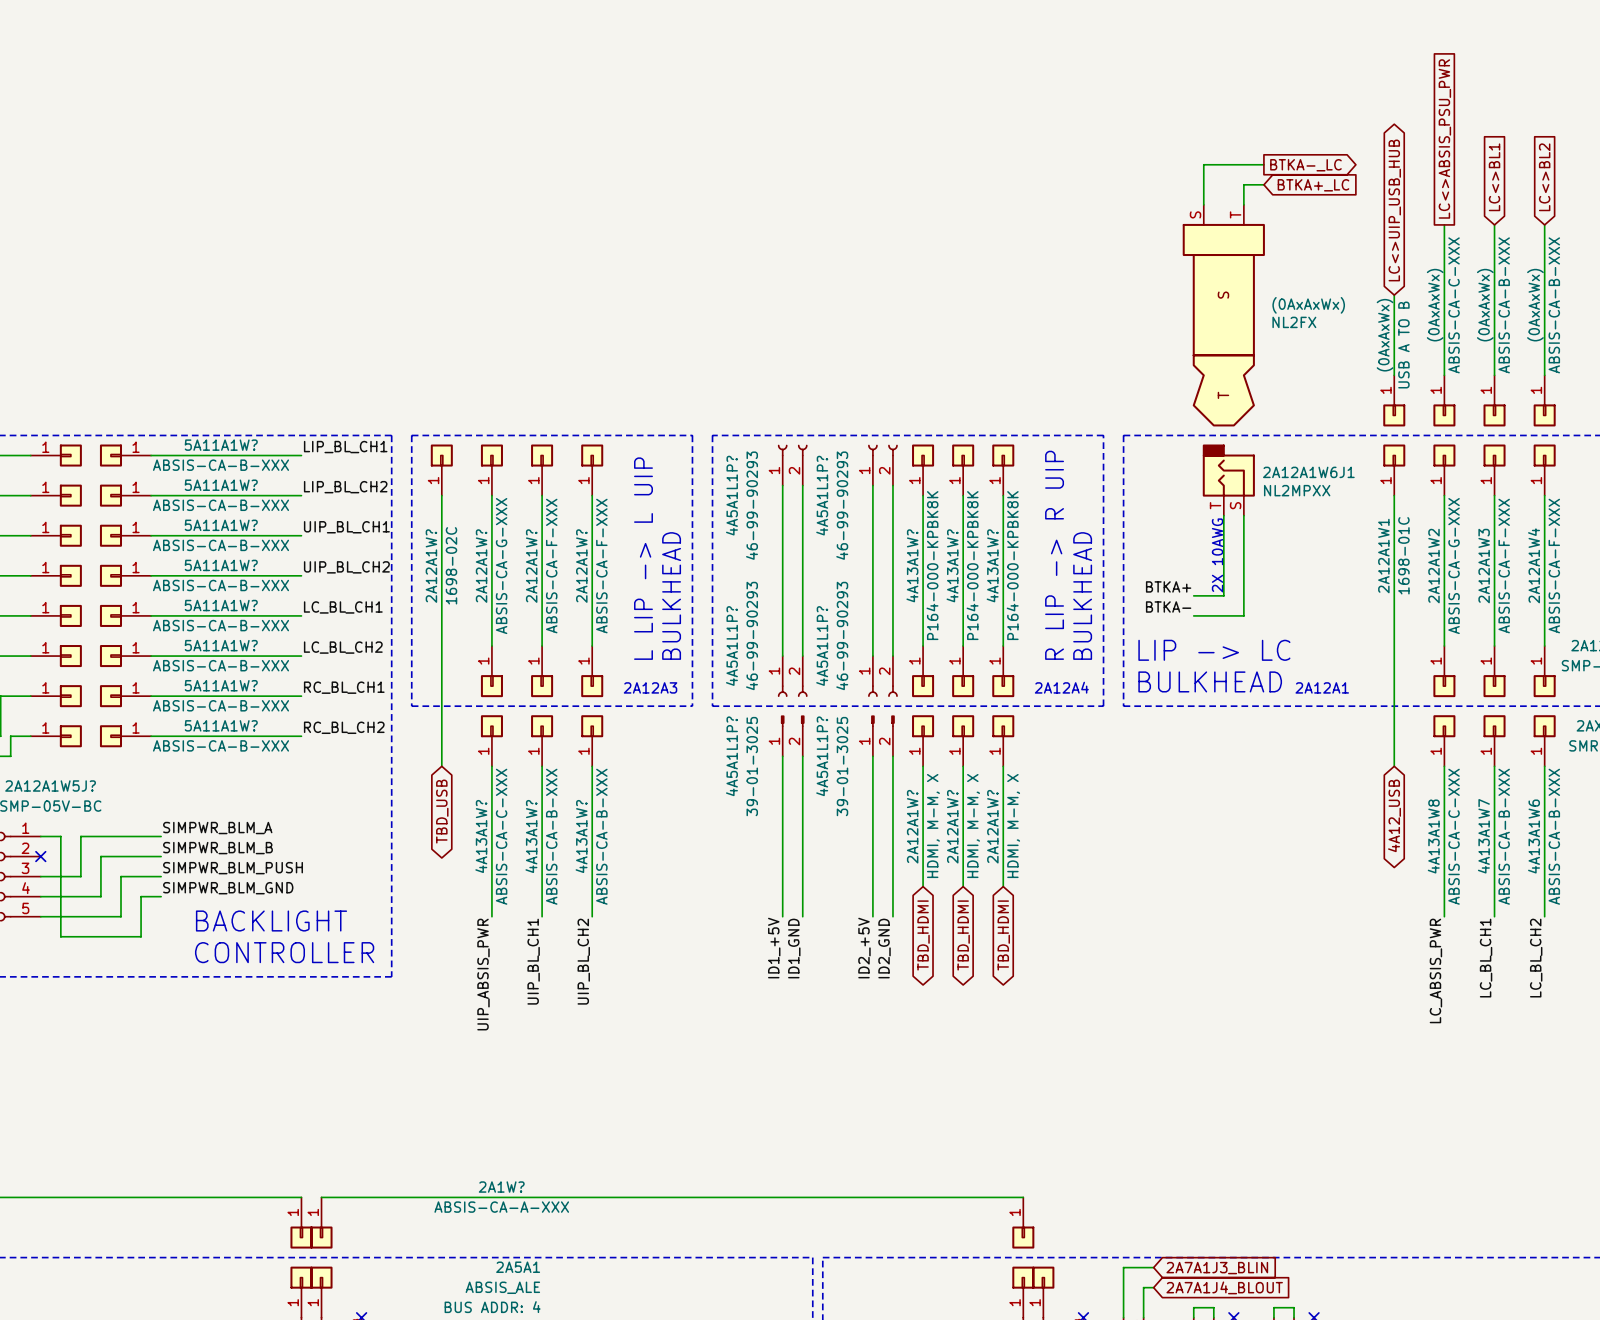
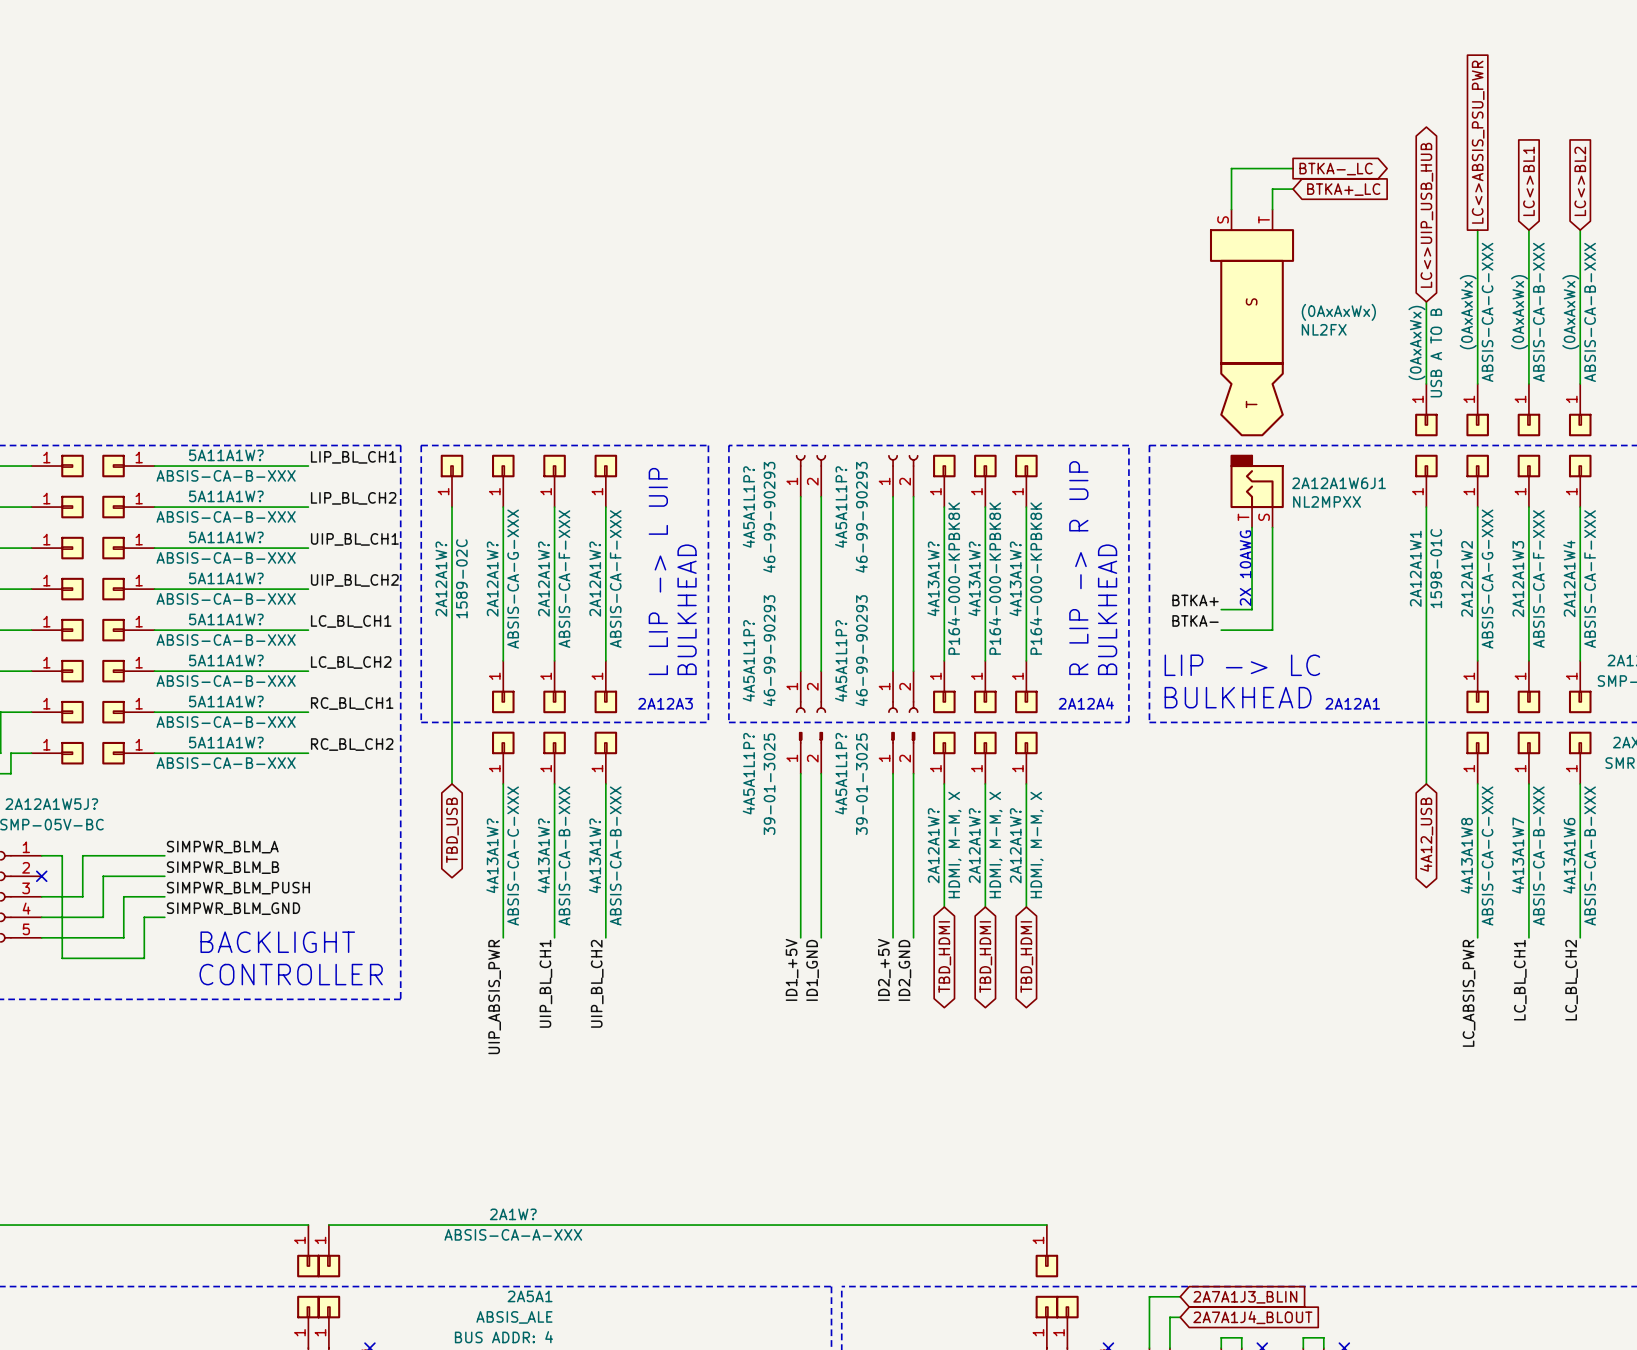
2A12A1W1 value: 1698-01C (1403, 555) -> 1598-01C (1436, 568)
2A12A1W? value: 1698-02C (451, 565) -> 1589-02C (461, 578)

